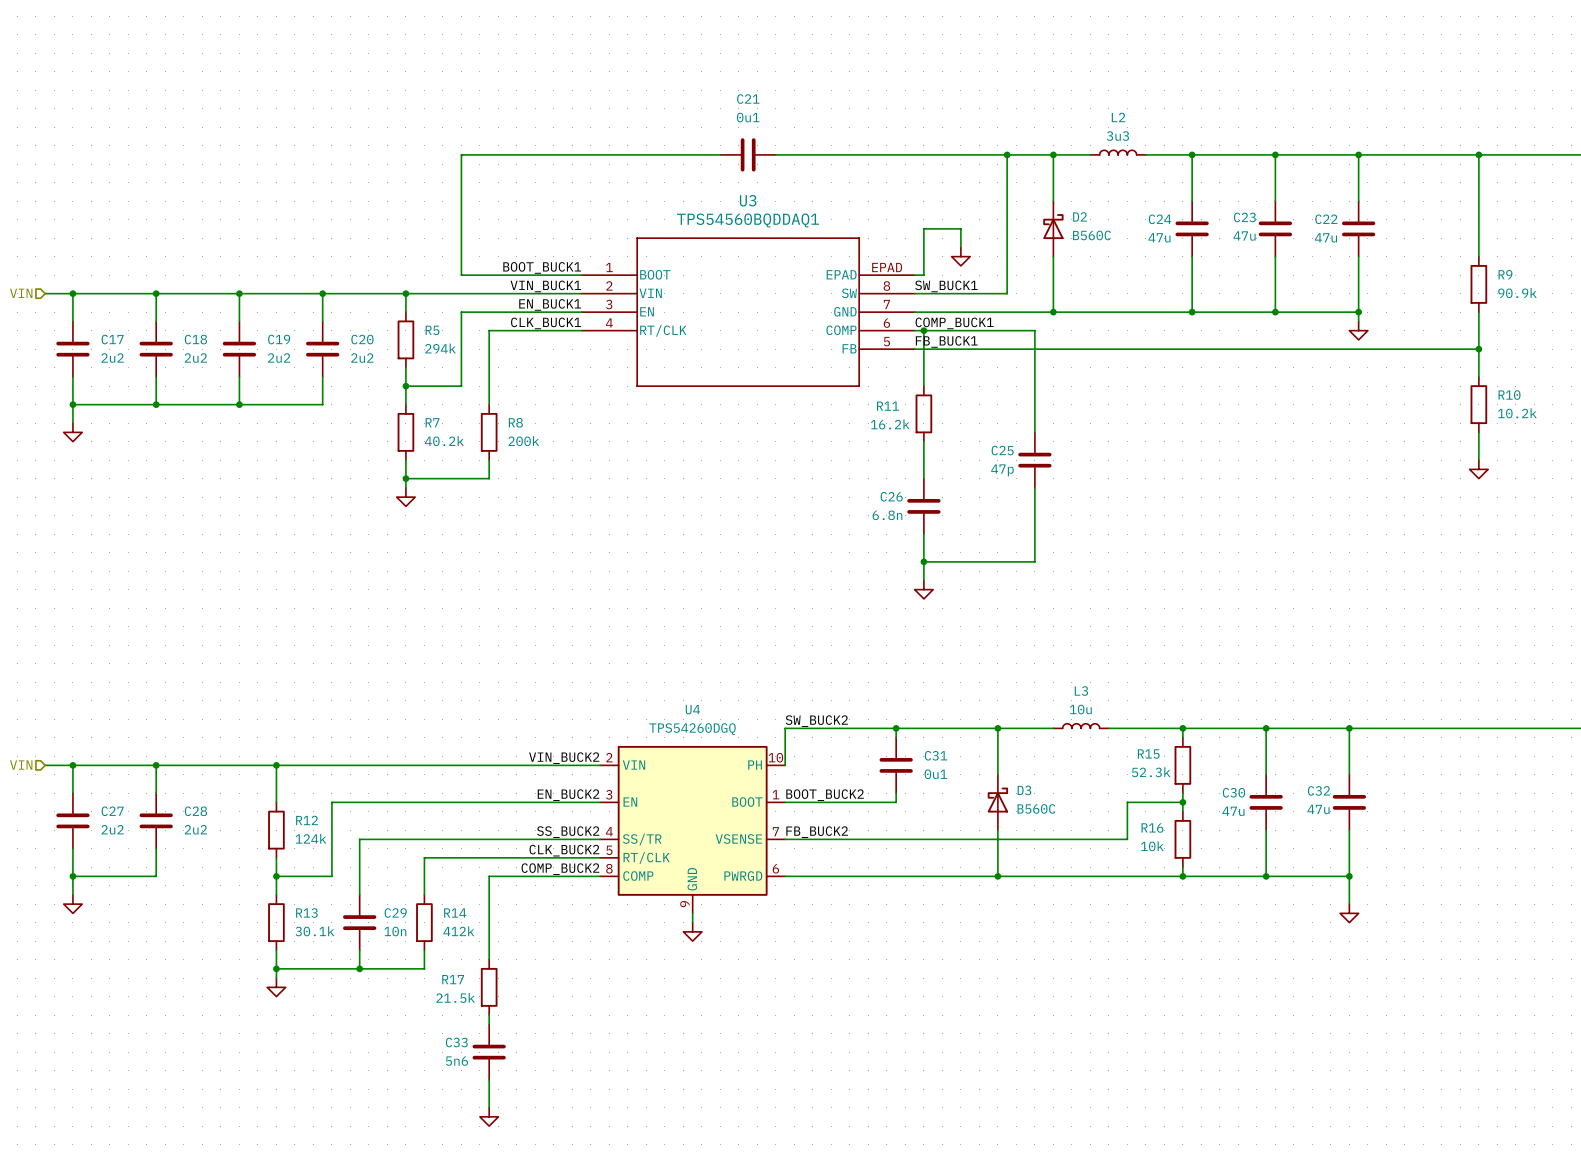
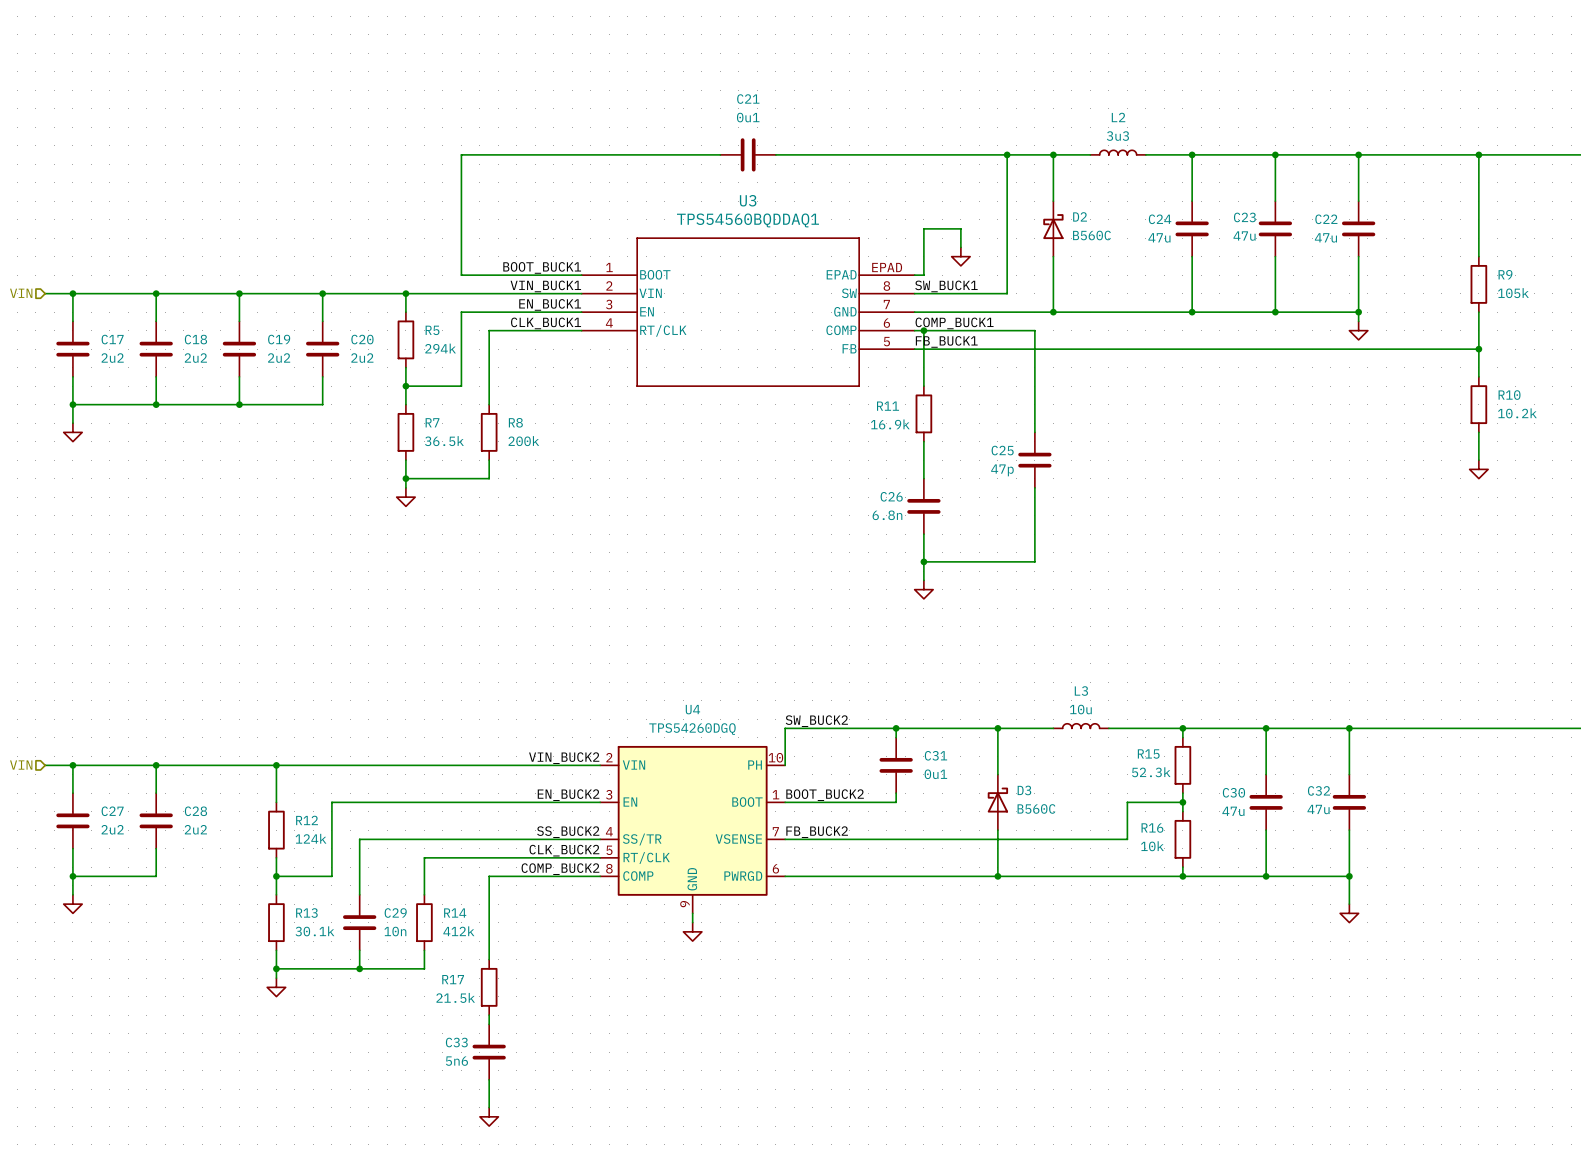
R9 value: 90.9k (1517, 293) -> 105k (1513, 293)
R11 value: 16.2k (890, 424) -> 16.9k (890, 424)
R7 value: 40.2k (444, 441) -> 36.5k (444, 441)

